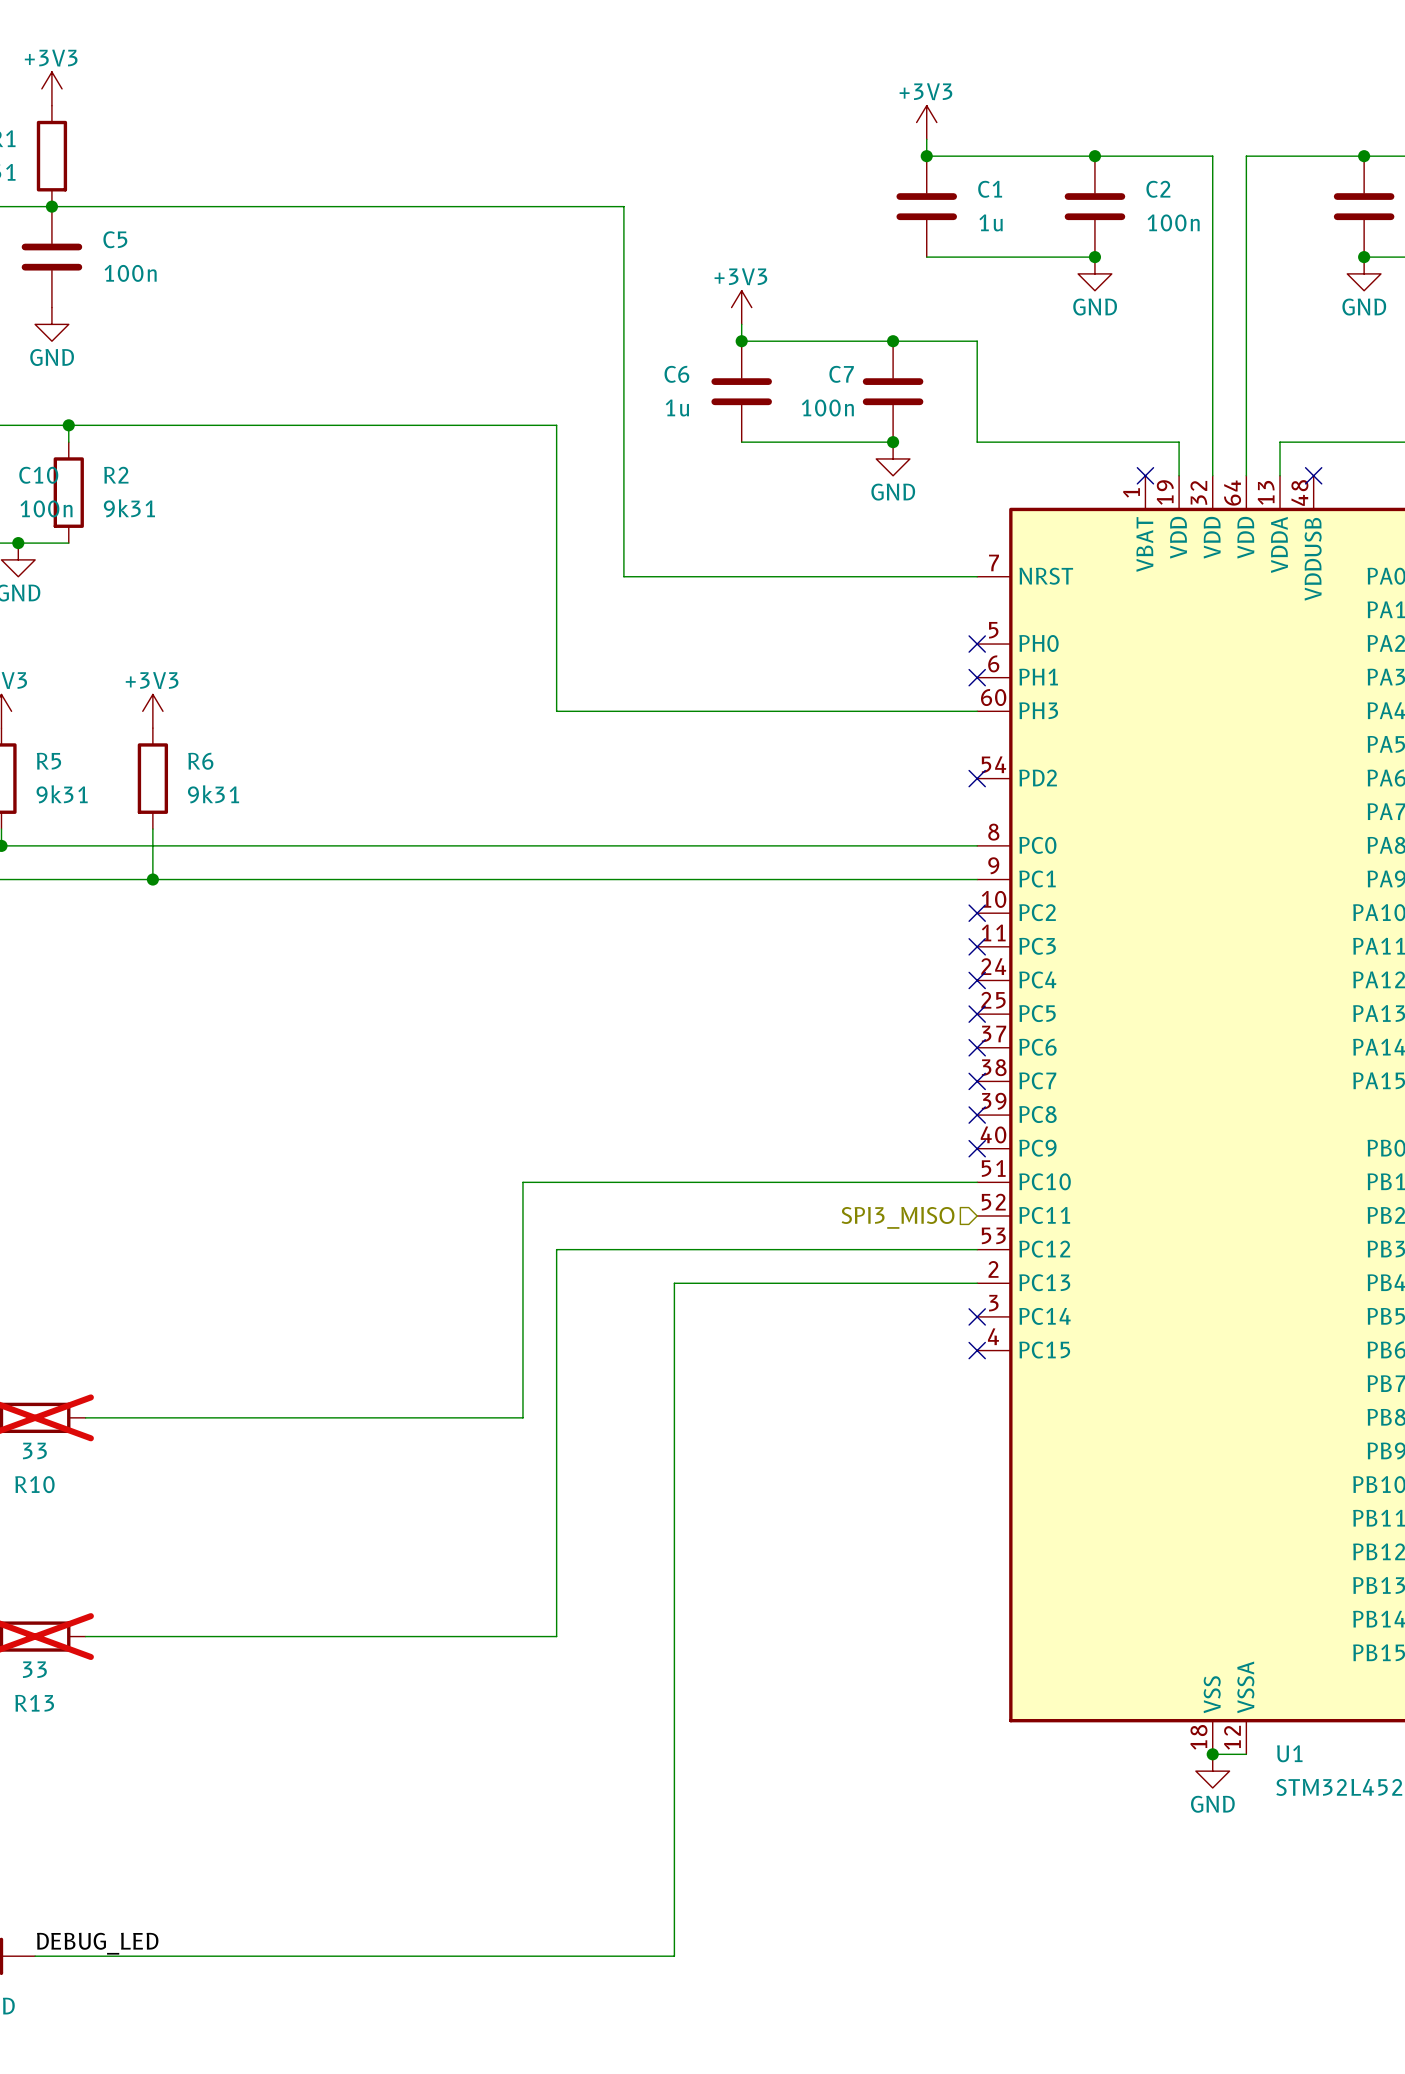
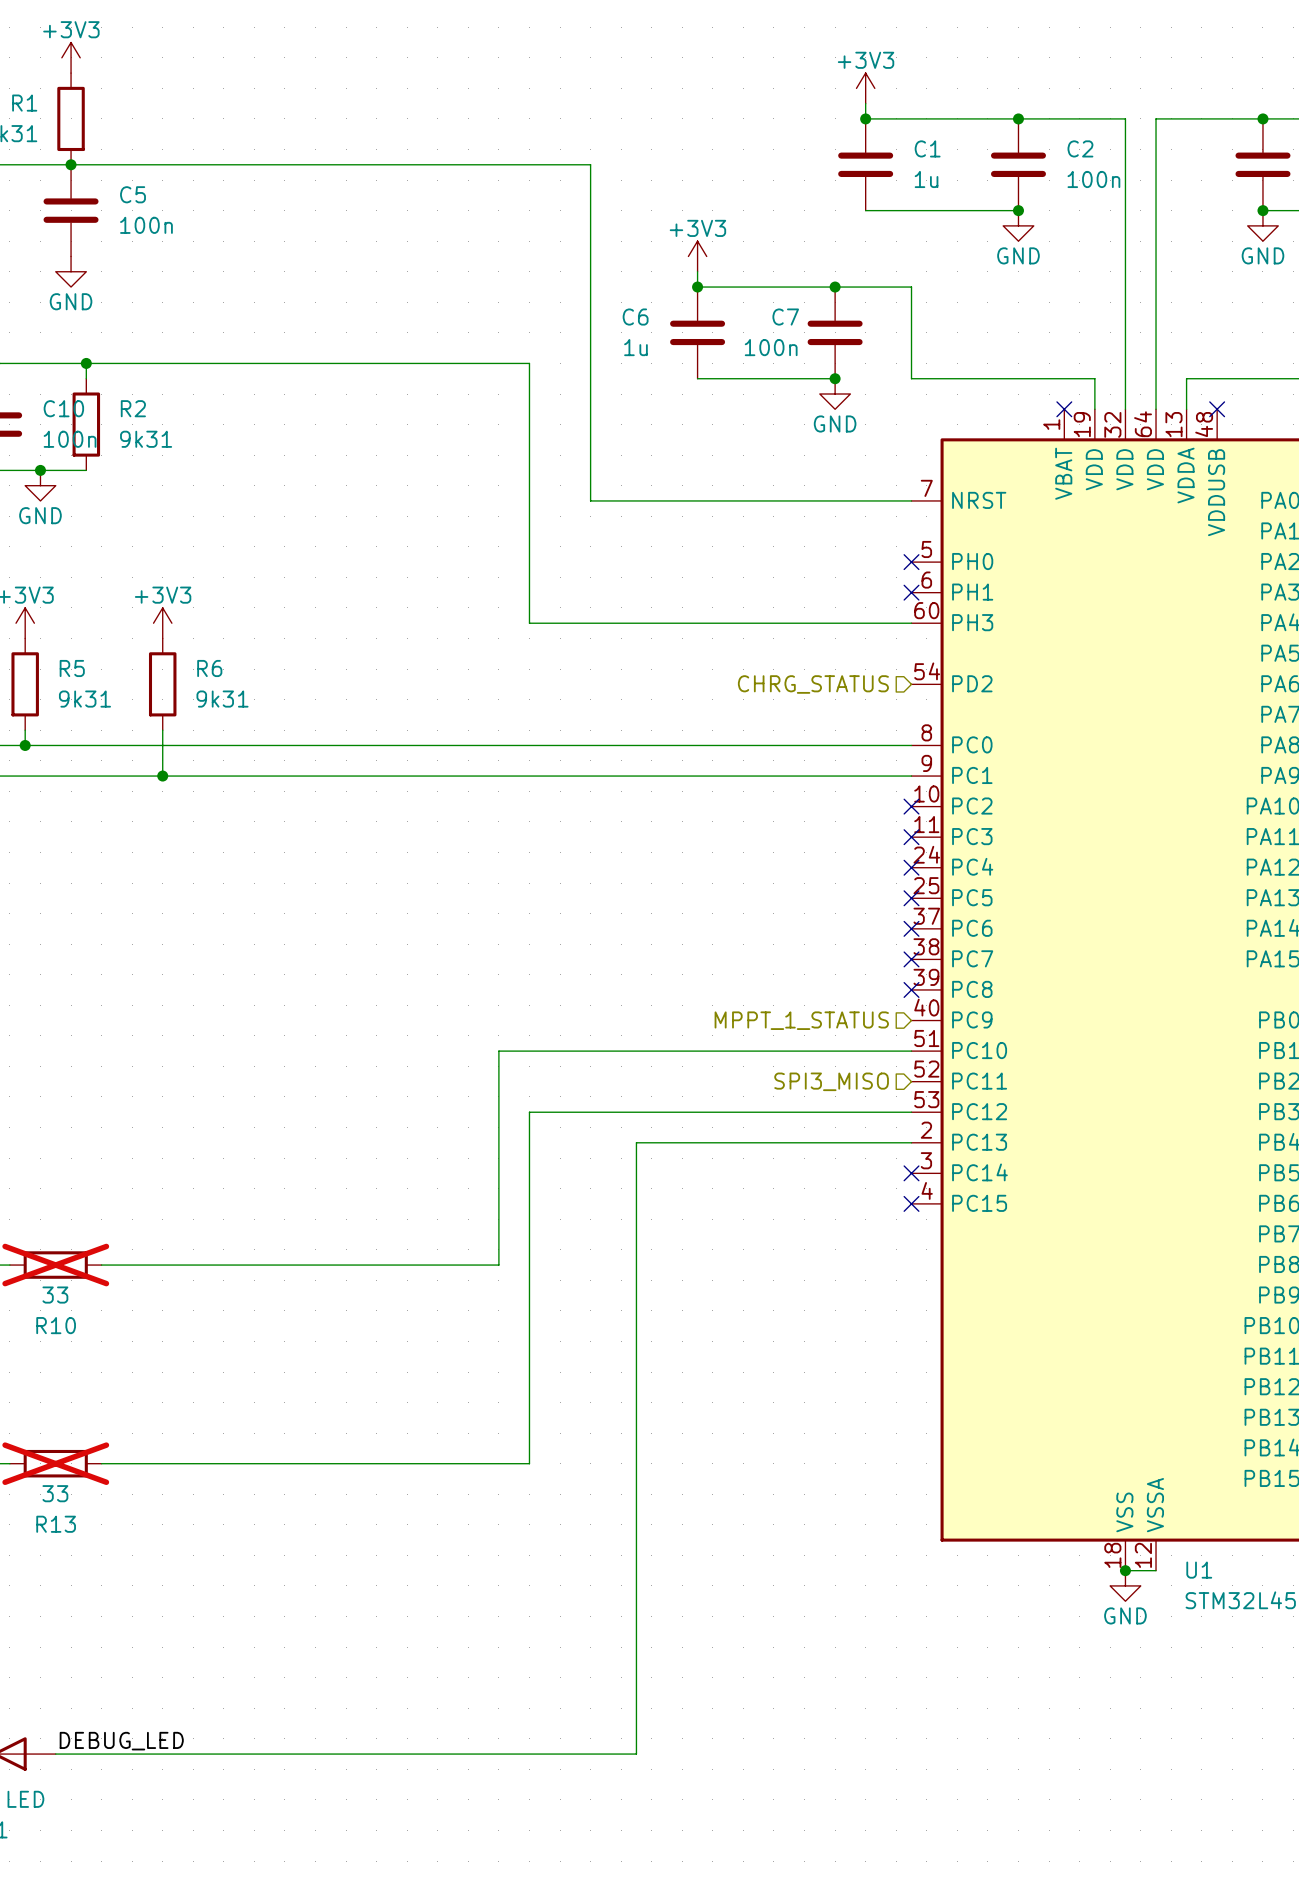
no-connect mark: (977, 778) -> none
hierarchical label: none -> CHRG_STATUS (813, 684)
no-connect mark: (977, 1148) -> none
hierarchical label: none -> MPPT_1_STATUS (801, 1020)

